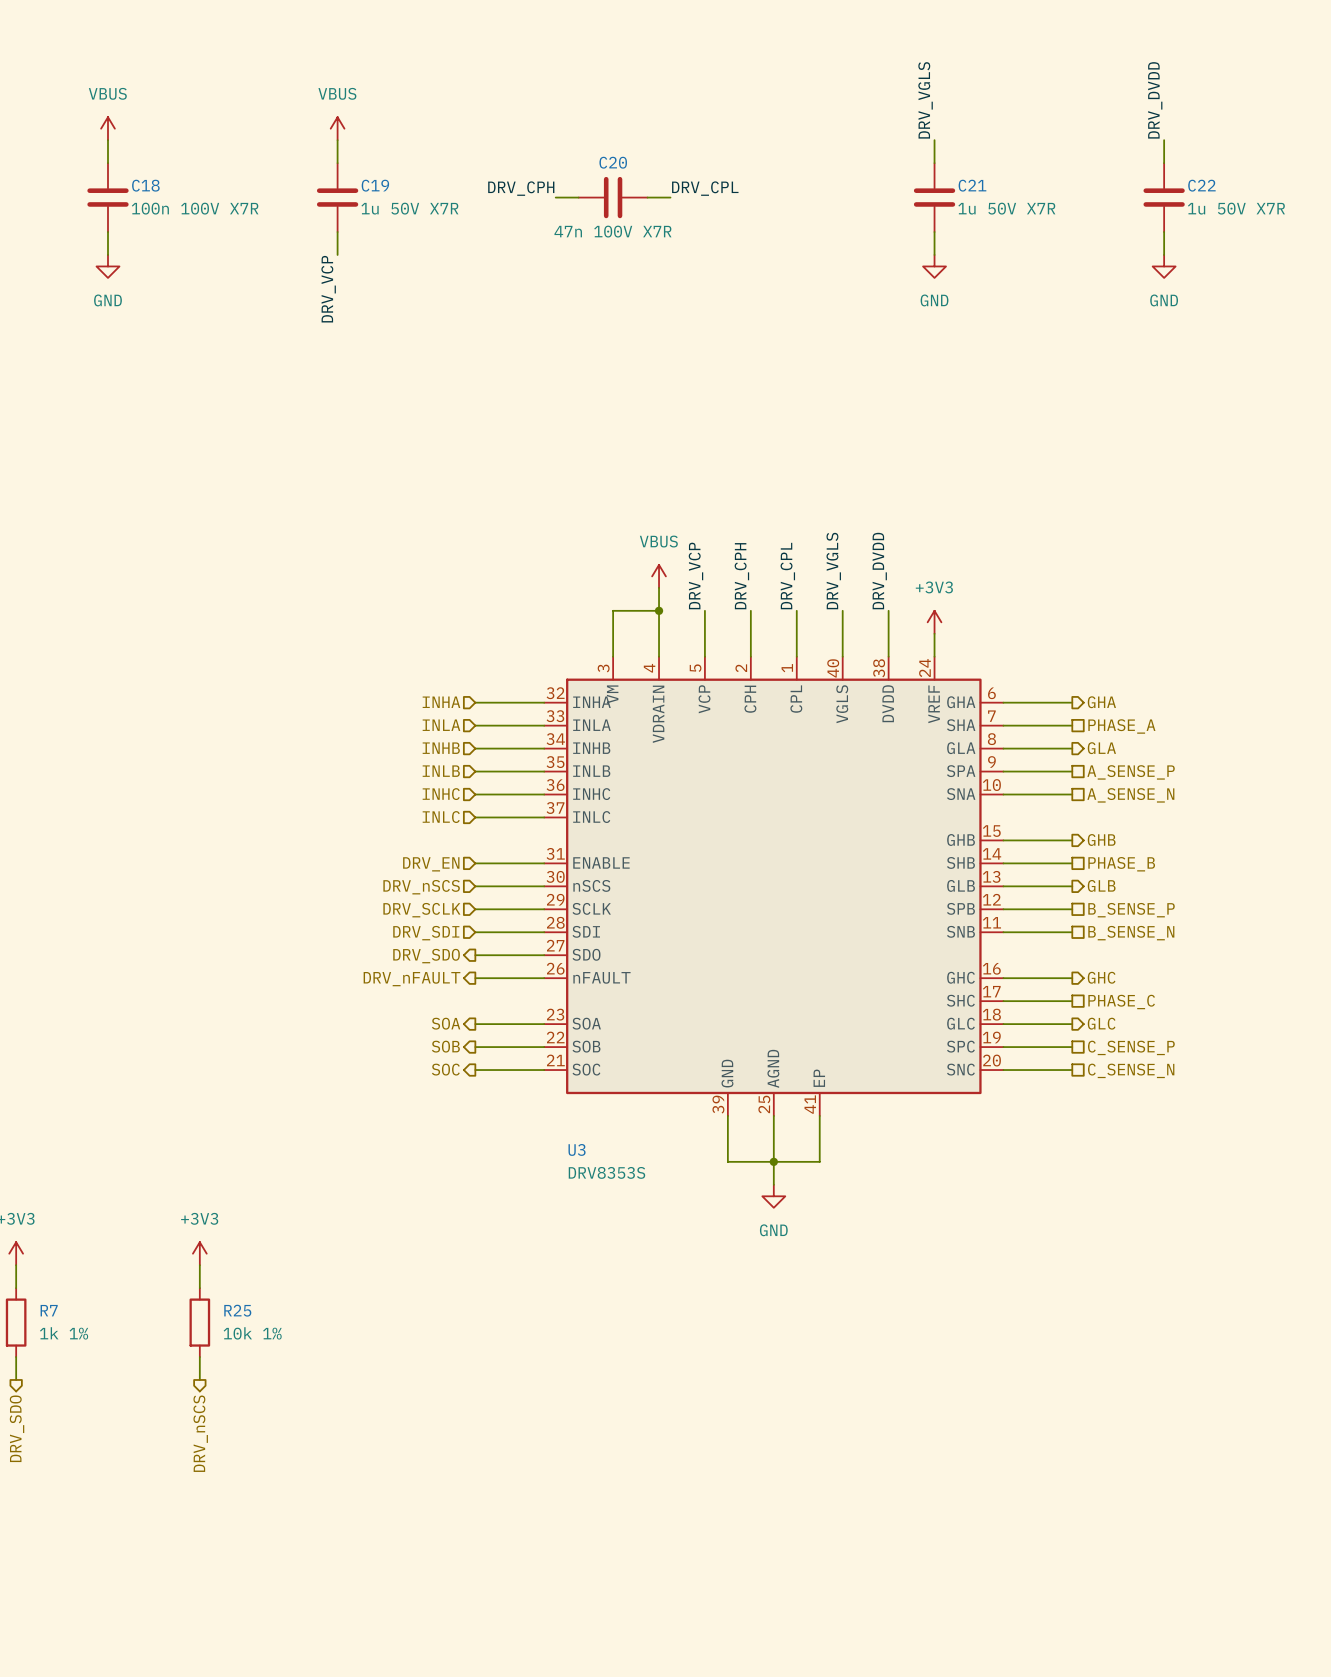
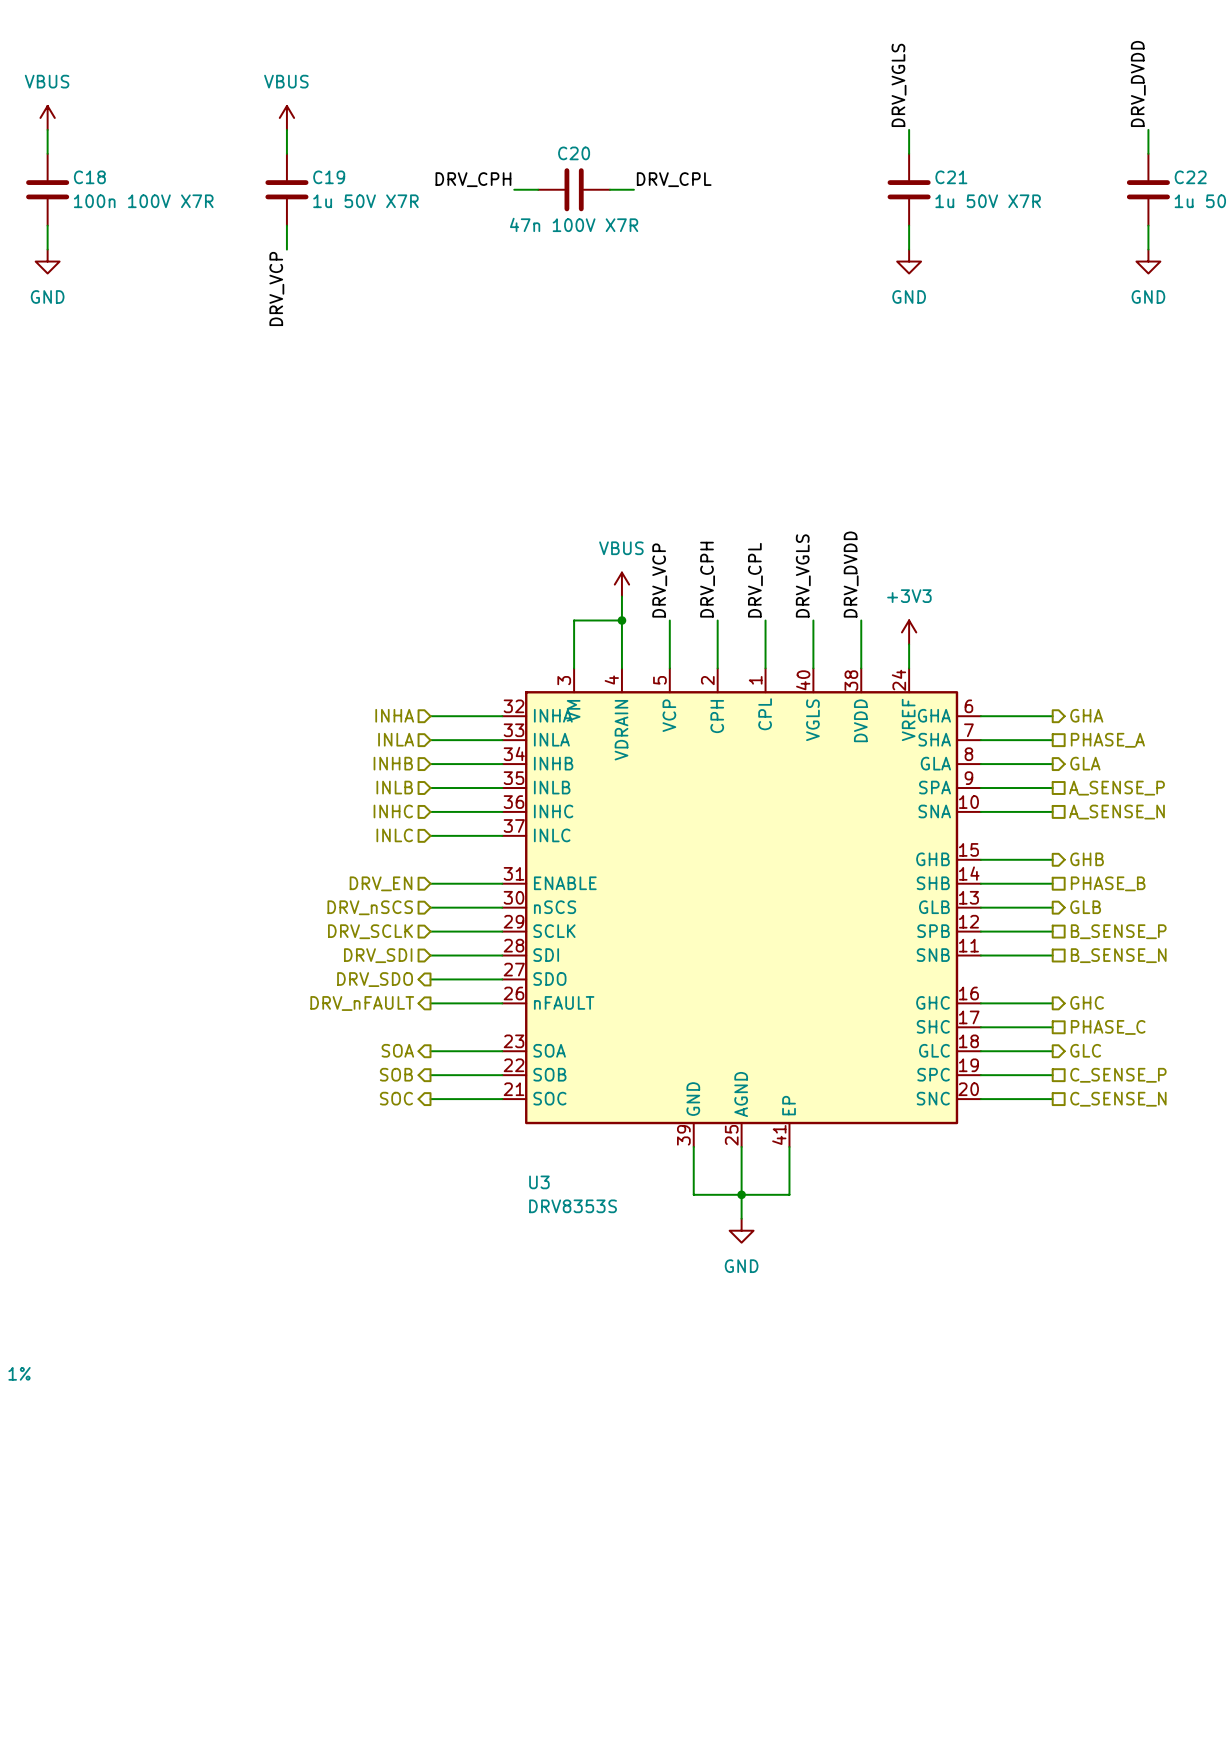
power symbol: +3V3 (199, 1253) -> none
wire: (199, 1265) (199, 1288) -> none
R25: 10k 1% (199, 1322) -> none
wire: (199, 1357) (199, 1379) -> none
hierarchical label: DRV_nSCS (200, 1433) -> none

